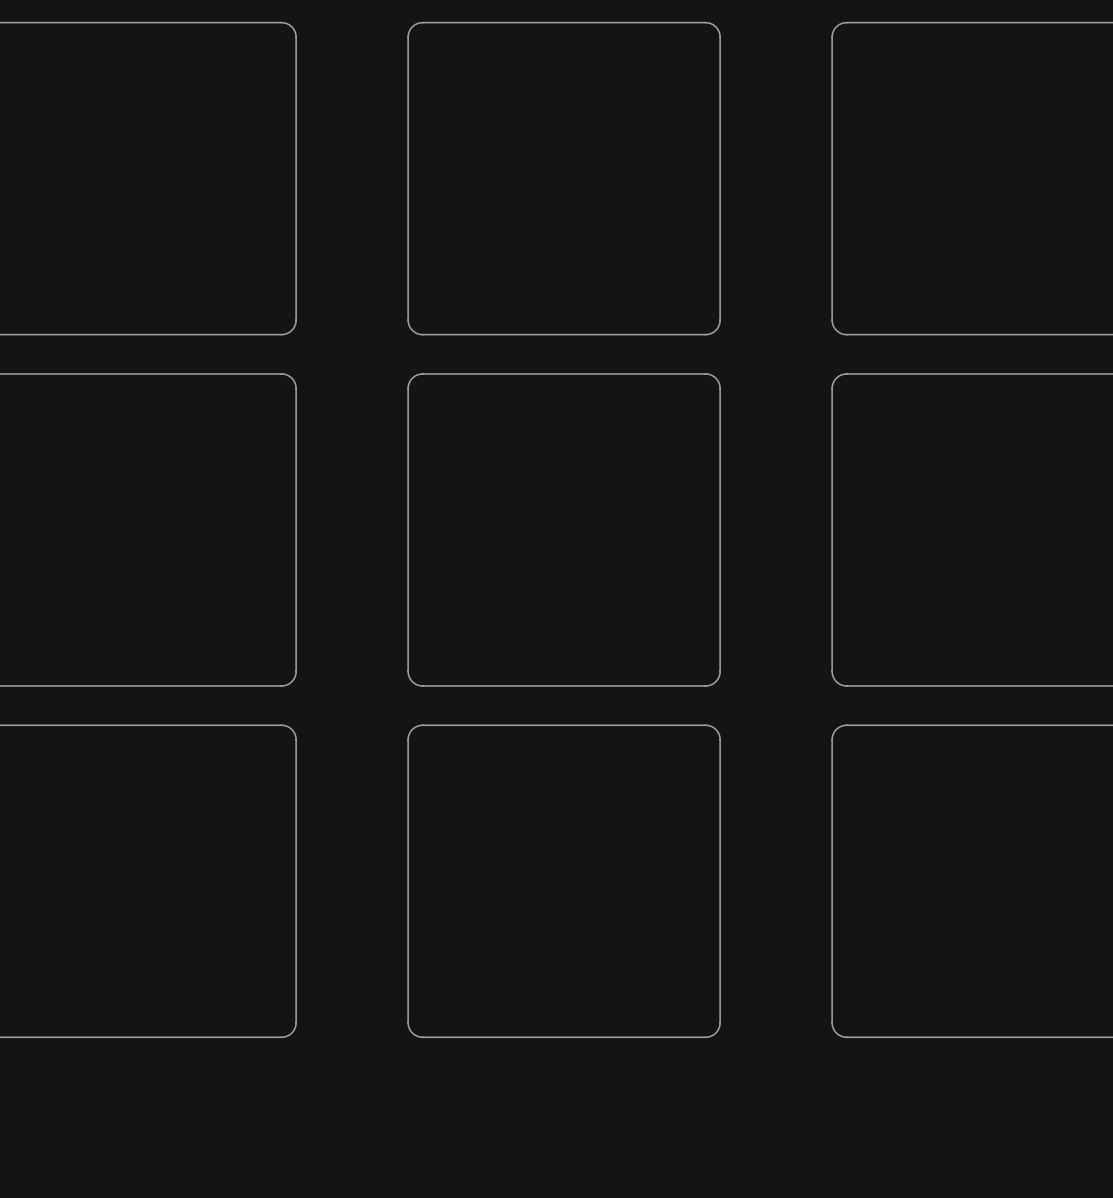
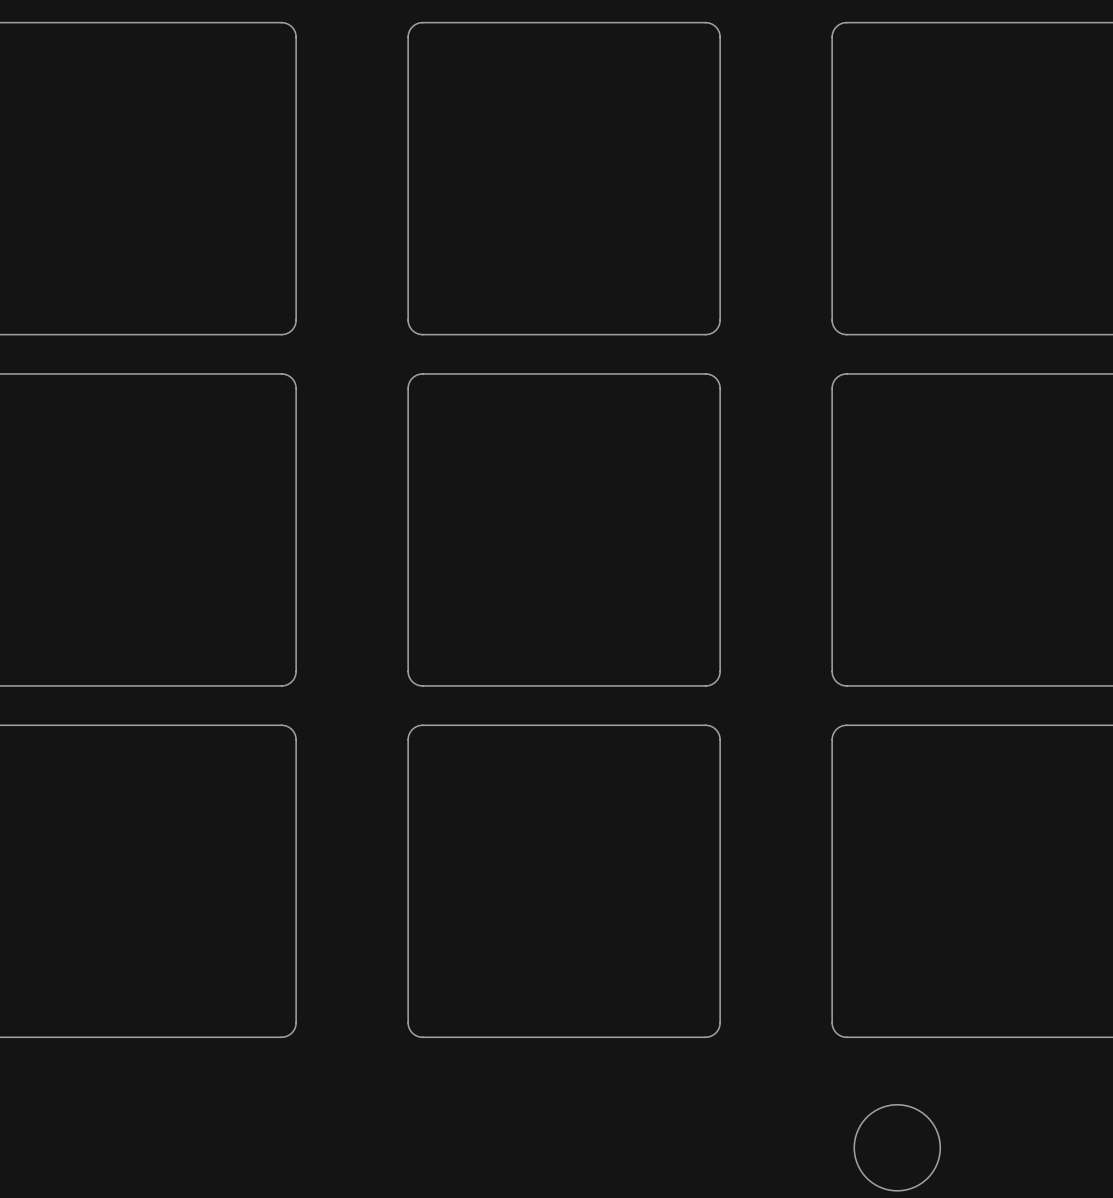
round board edge: none -> [853, 1104, 941, 1192]

